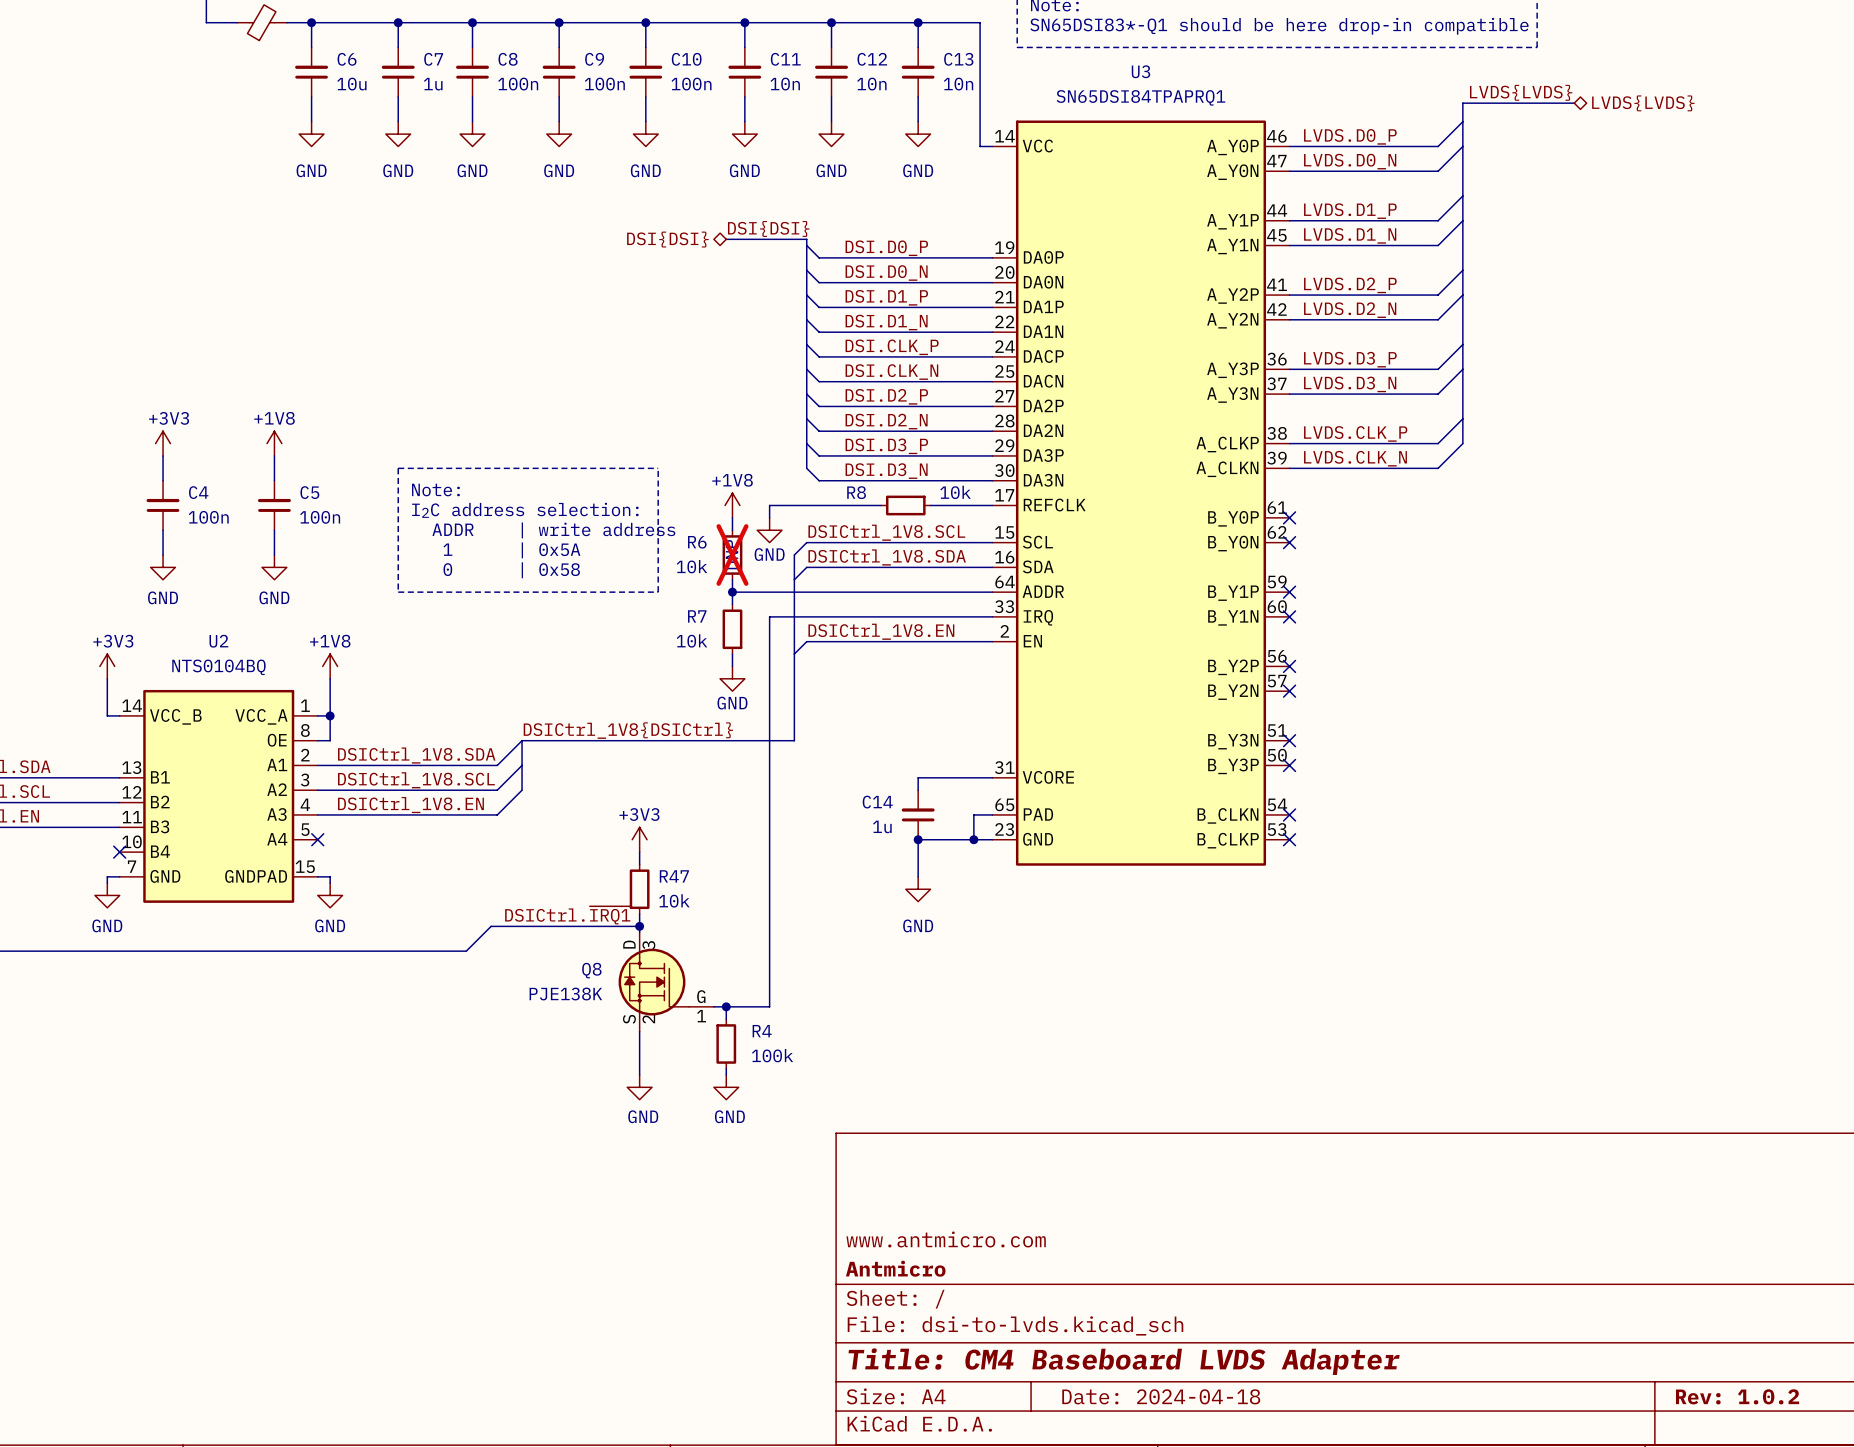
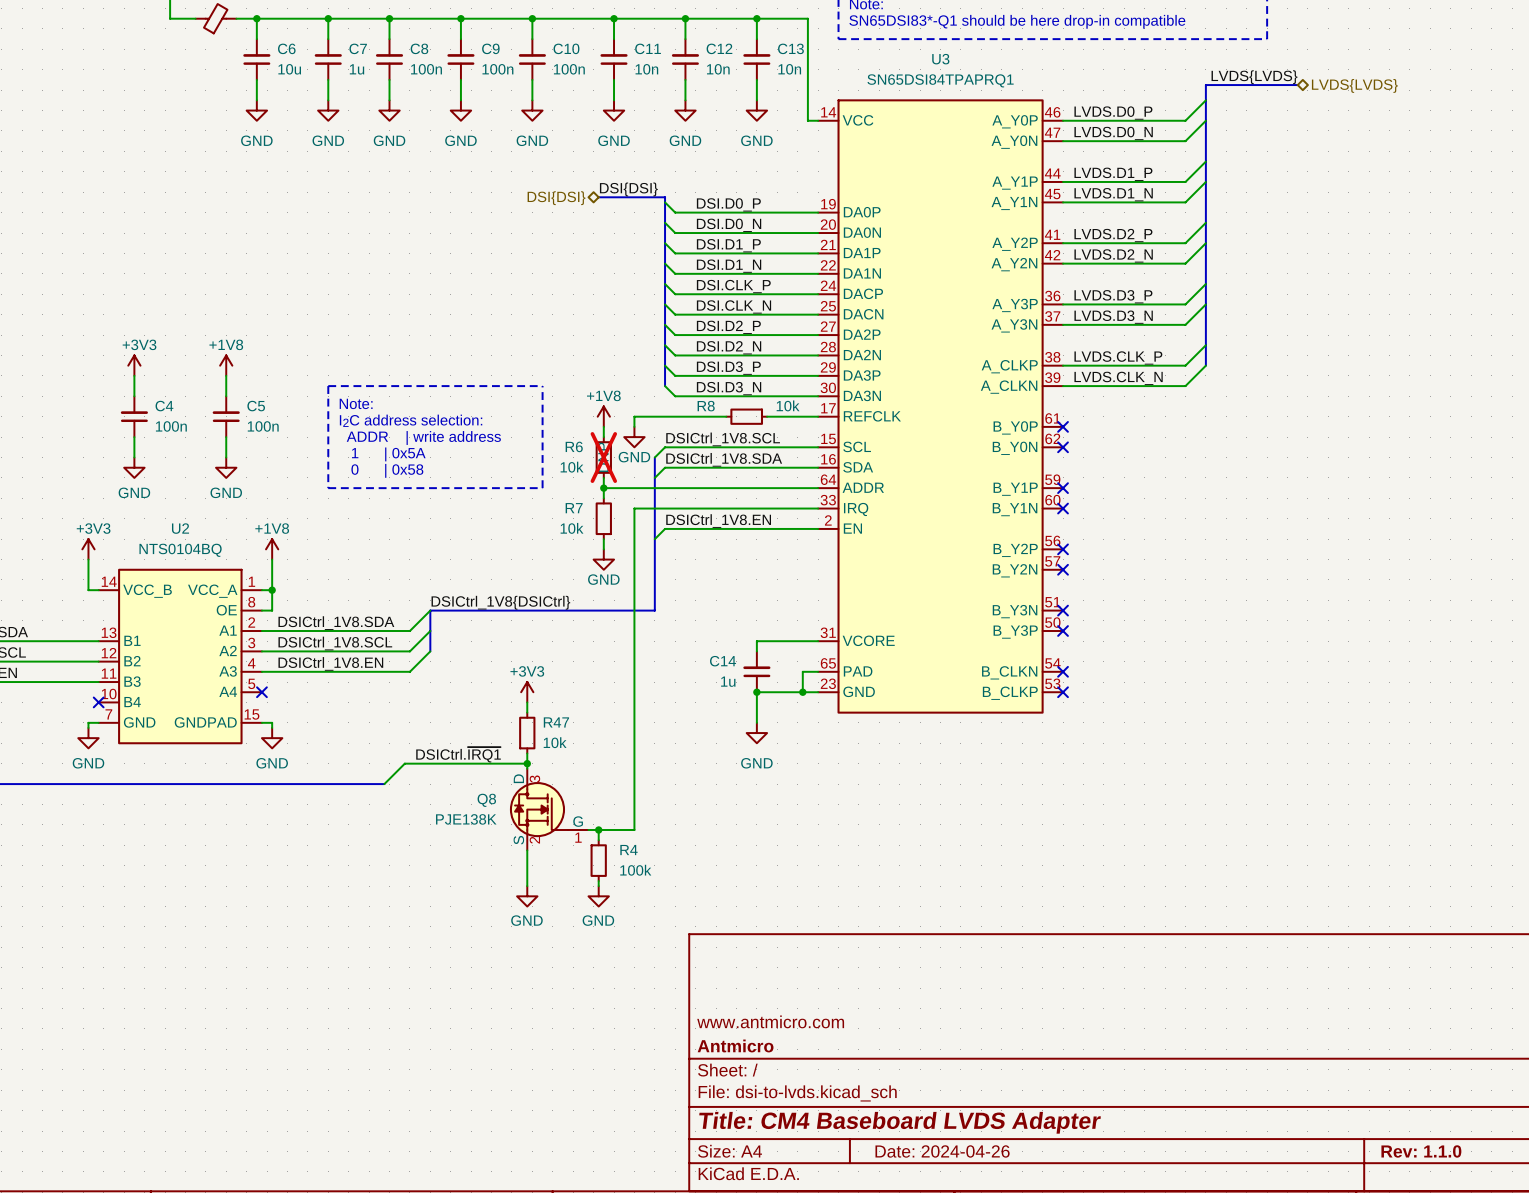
title block: Date: 2024-04-18 (1161, 1396) -> Date: 2024-04-26 (942, 1151)
title block: Rev: 1.0.2 (1737, 1396) -> Rev: 1.1.0 (1421, 1151)

